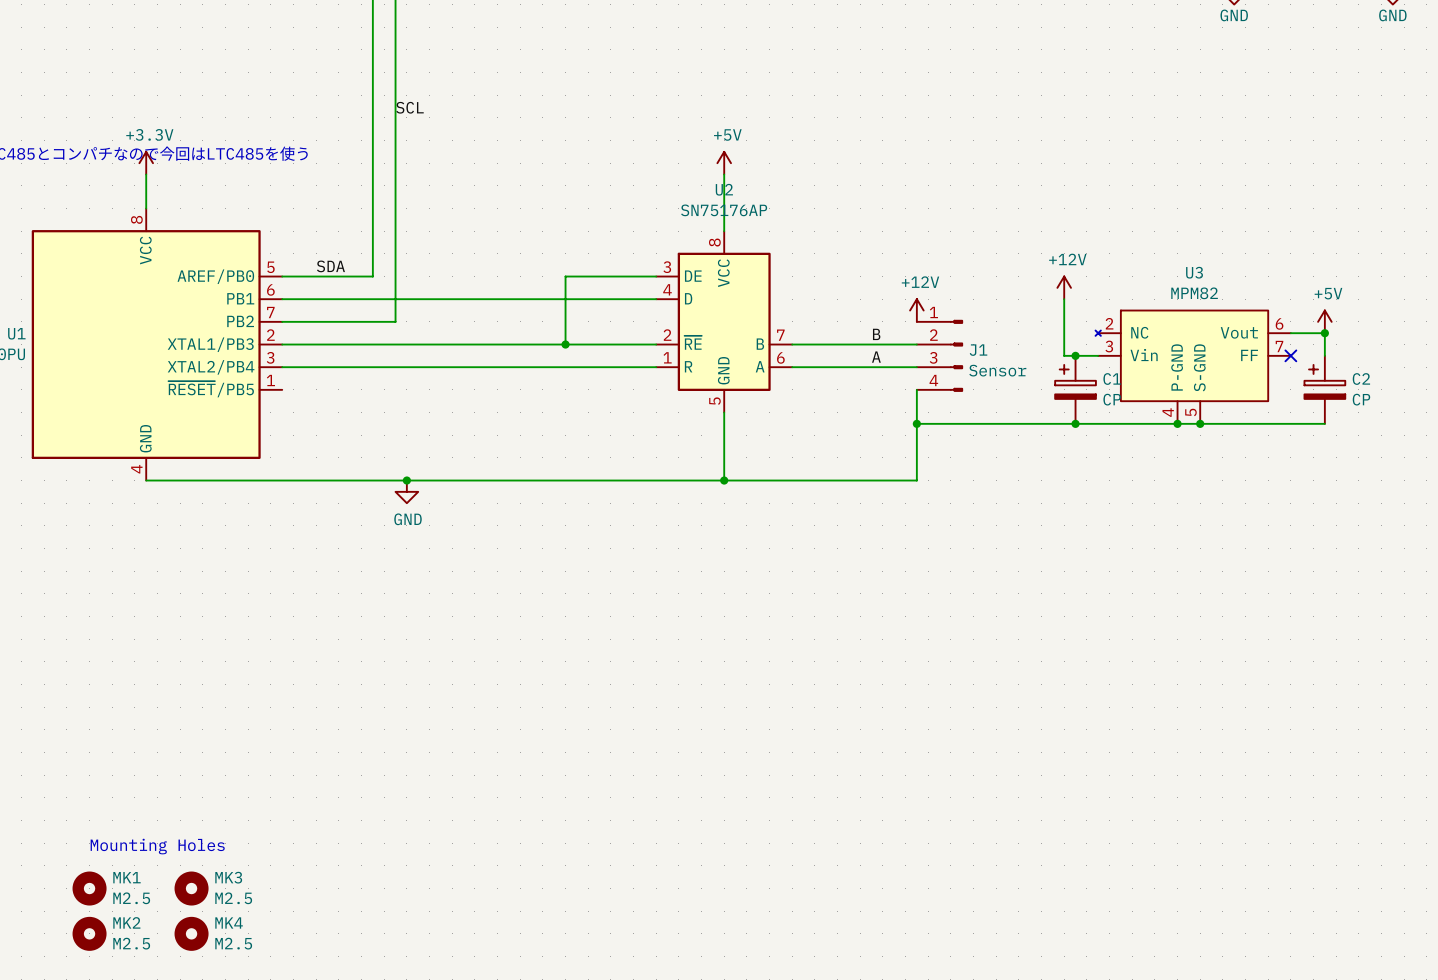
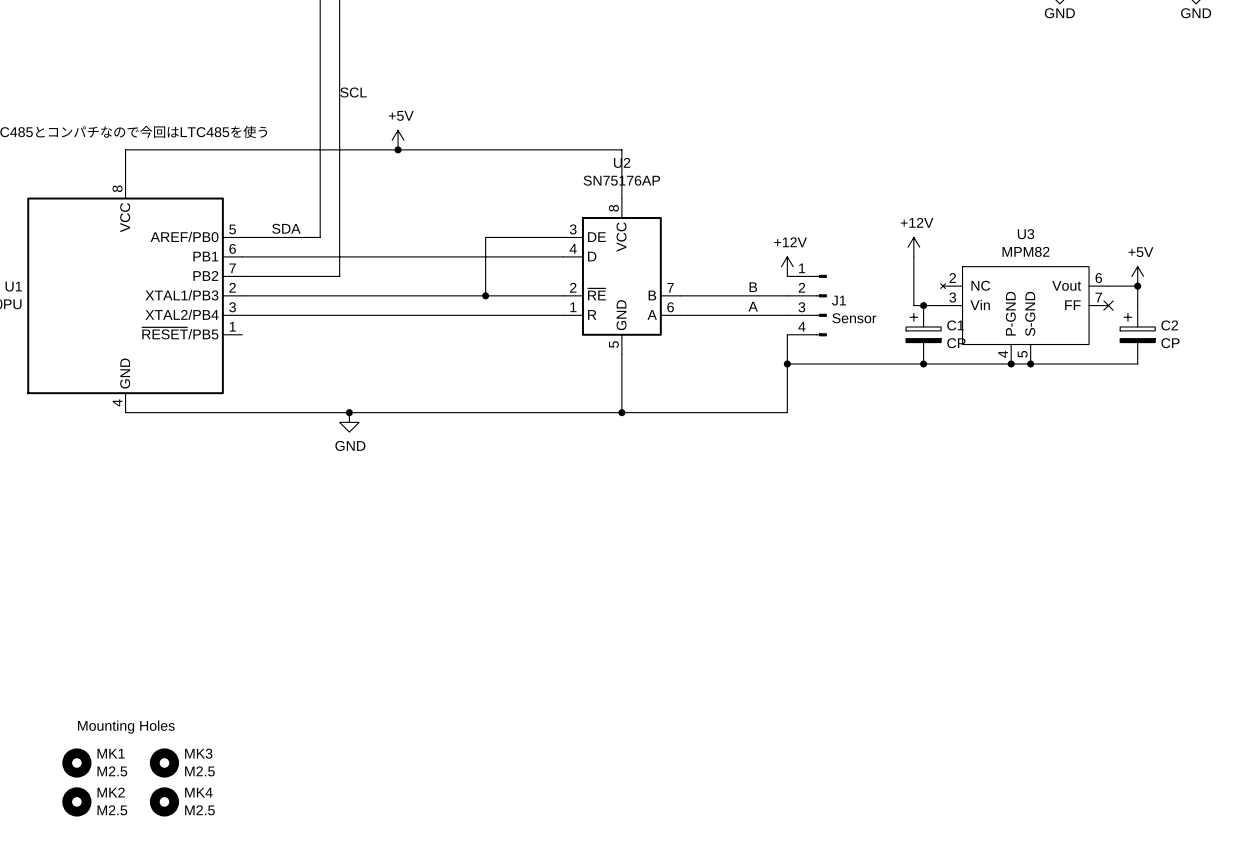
power symbol: +3.3V (146, 163) -> none
power symbol: none -> +5V (398, 140)
power symbol: +5V (724, 163) -> none
wire: none -> (125, 149) (621, 149)
junction: none -> (398, 149)

